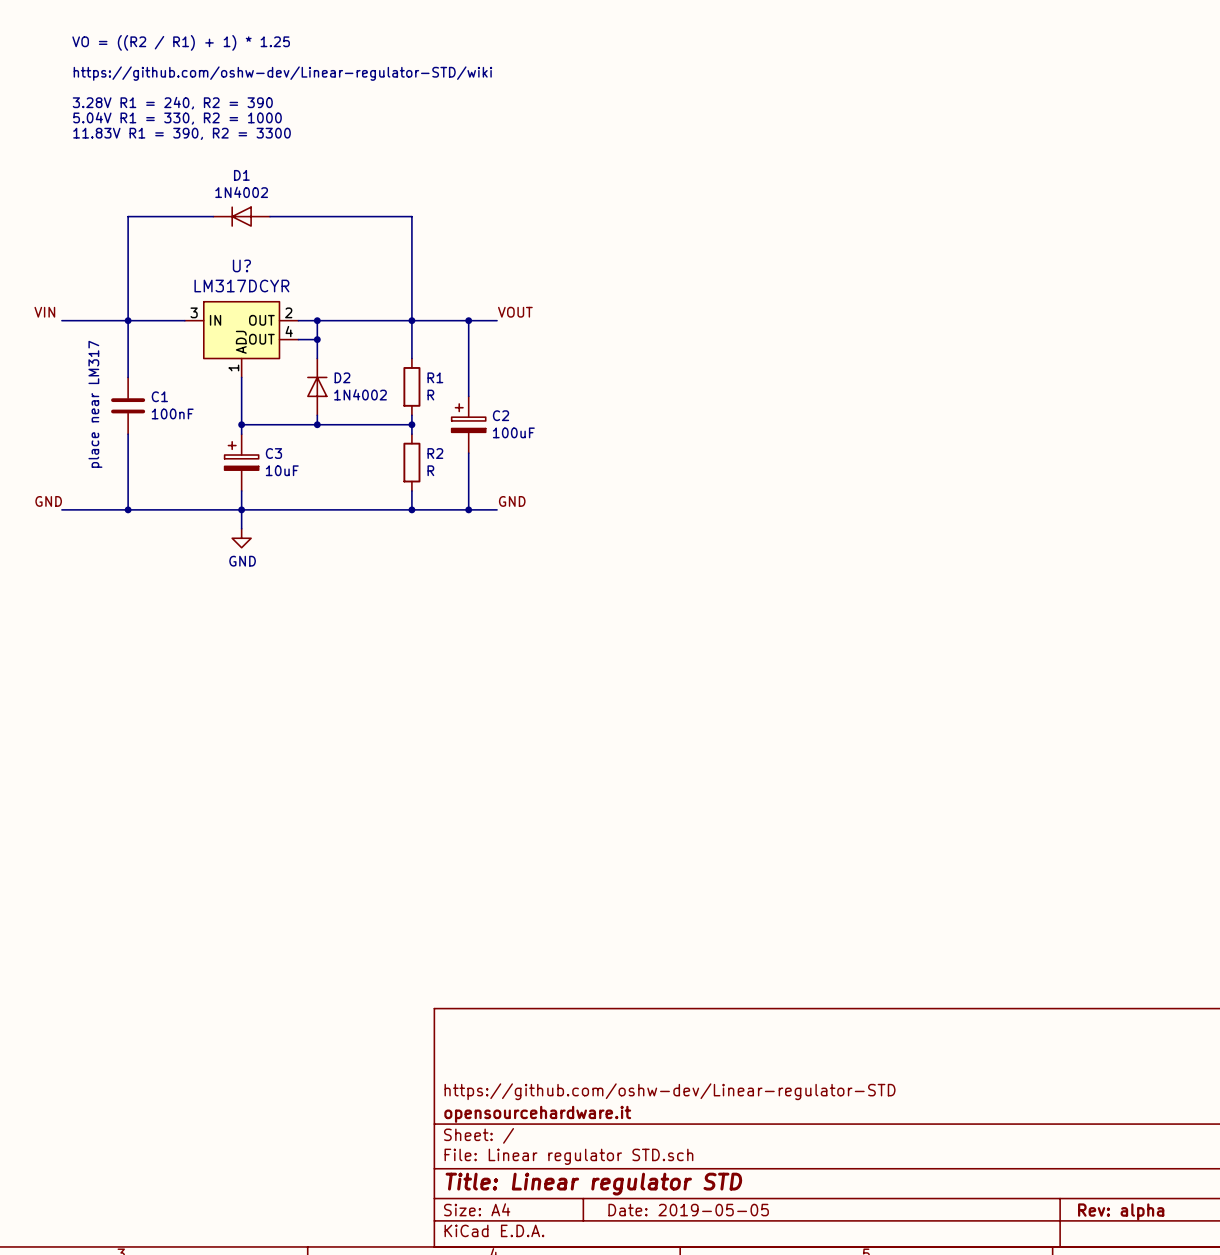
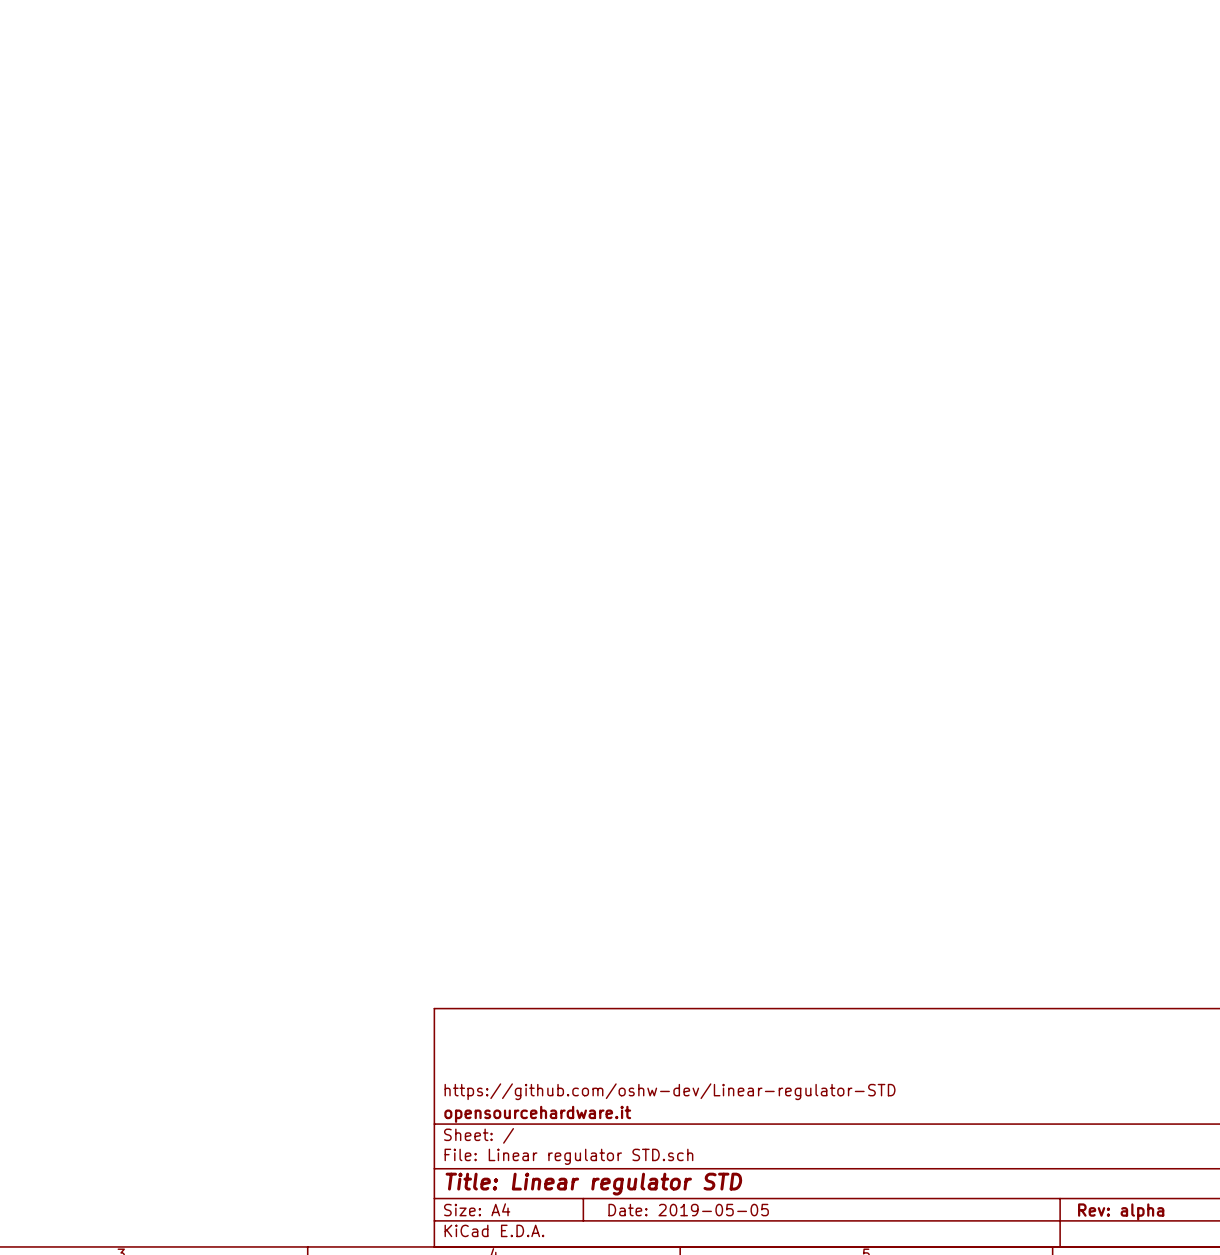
text: VO = ((R2 / R1) + 1) * 1.25 (181, 42) -> none
text: https://github.com/oshw-dev/Linear-regulator-STD/wiki (282, 73) -> none
text: 3.28V R1 = 240, R2 = 390 (172, 103) -> none
text: 5.04V R1 = 330, R2 = 1000 (177, 118) -> none
text: 11.83V R1 = 390, R2 = 3300 (182, 133) -> none
wire: (213, 216) (128, 216) (128, 377) -> none
D1: 1N4002 (241, 216) -> none
wire: (270, 216) (411, 216) (411, 358) -> none
label: VIN (44, 312) -> none
label: VOUT (515, 312) -> none
wire: (61, 320) (184, 320) -> none
junction: (128, 320) -> none
wire: (298, 320) (497, 320) -> none
wire: (317, 320) (317, 358) -> none
junction: (317, 320) -> none
junction: (411, 320) -> none
wire: (468, 320) (468, 396) -> none
junction: (468, 320) -> none
U?: LM317DCYR (241, 339) -> none
wire: (298, 339) (317, 339) -> none
junction: (317, 339) -> none
wire: (241, 377) (241, 434) -> none
D2: 1N4002 (317, 386) -> none
R1: R (411, 386) -> none
text: place near LM317 (95, 404) -> none
C1: 100nF (128, 405) -> none
wire: (317, 415) (317, 424) -> none
wire: (411, 415) (411, 434) -> none
wire: (241, 424) (411, 424) -> none
junction: (241, 424) -> none
junction: (317, 424) -> none
junction: (411, 424) -> none
C2: 100uF (468, 424) -> none
wire: (128, 434) (128, 509) -> none
wire: (468, 453) (468, 509) -> none
C3: 10uF (241, 462) -> none
R2: R (411, 462) -> none
wire: (241, 490) (241, 528) -> none
wire: (411, 490) (411, 509) -> none
label: GND (48, 501) -> none
label: GND (512, 501) -> none
wire: (61, 509) (497, 509) -> none
junction: (128, 509) -> none
junction: (241, 509) -> none
junction: (411, 509) -> none
junction: (468, 509) -> none
power symbol: GND (241, 538) -> none

